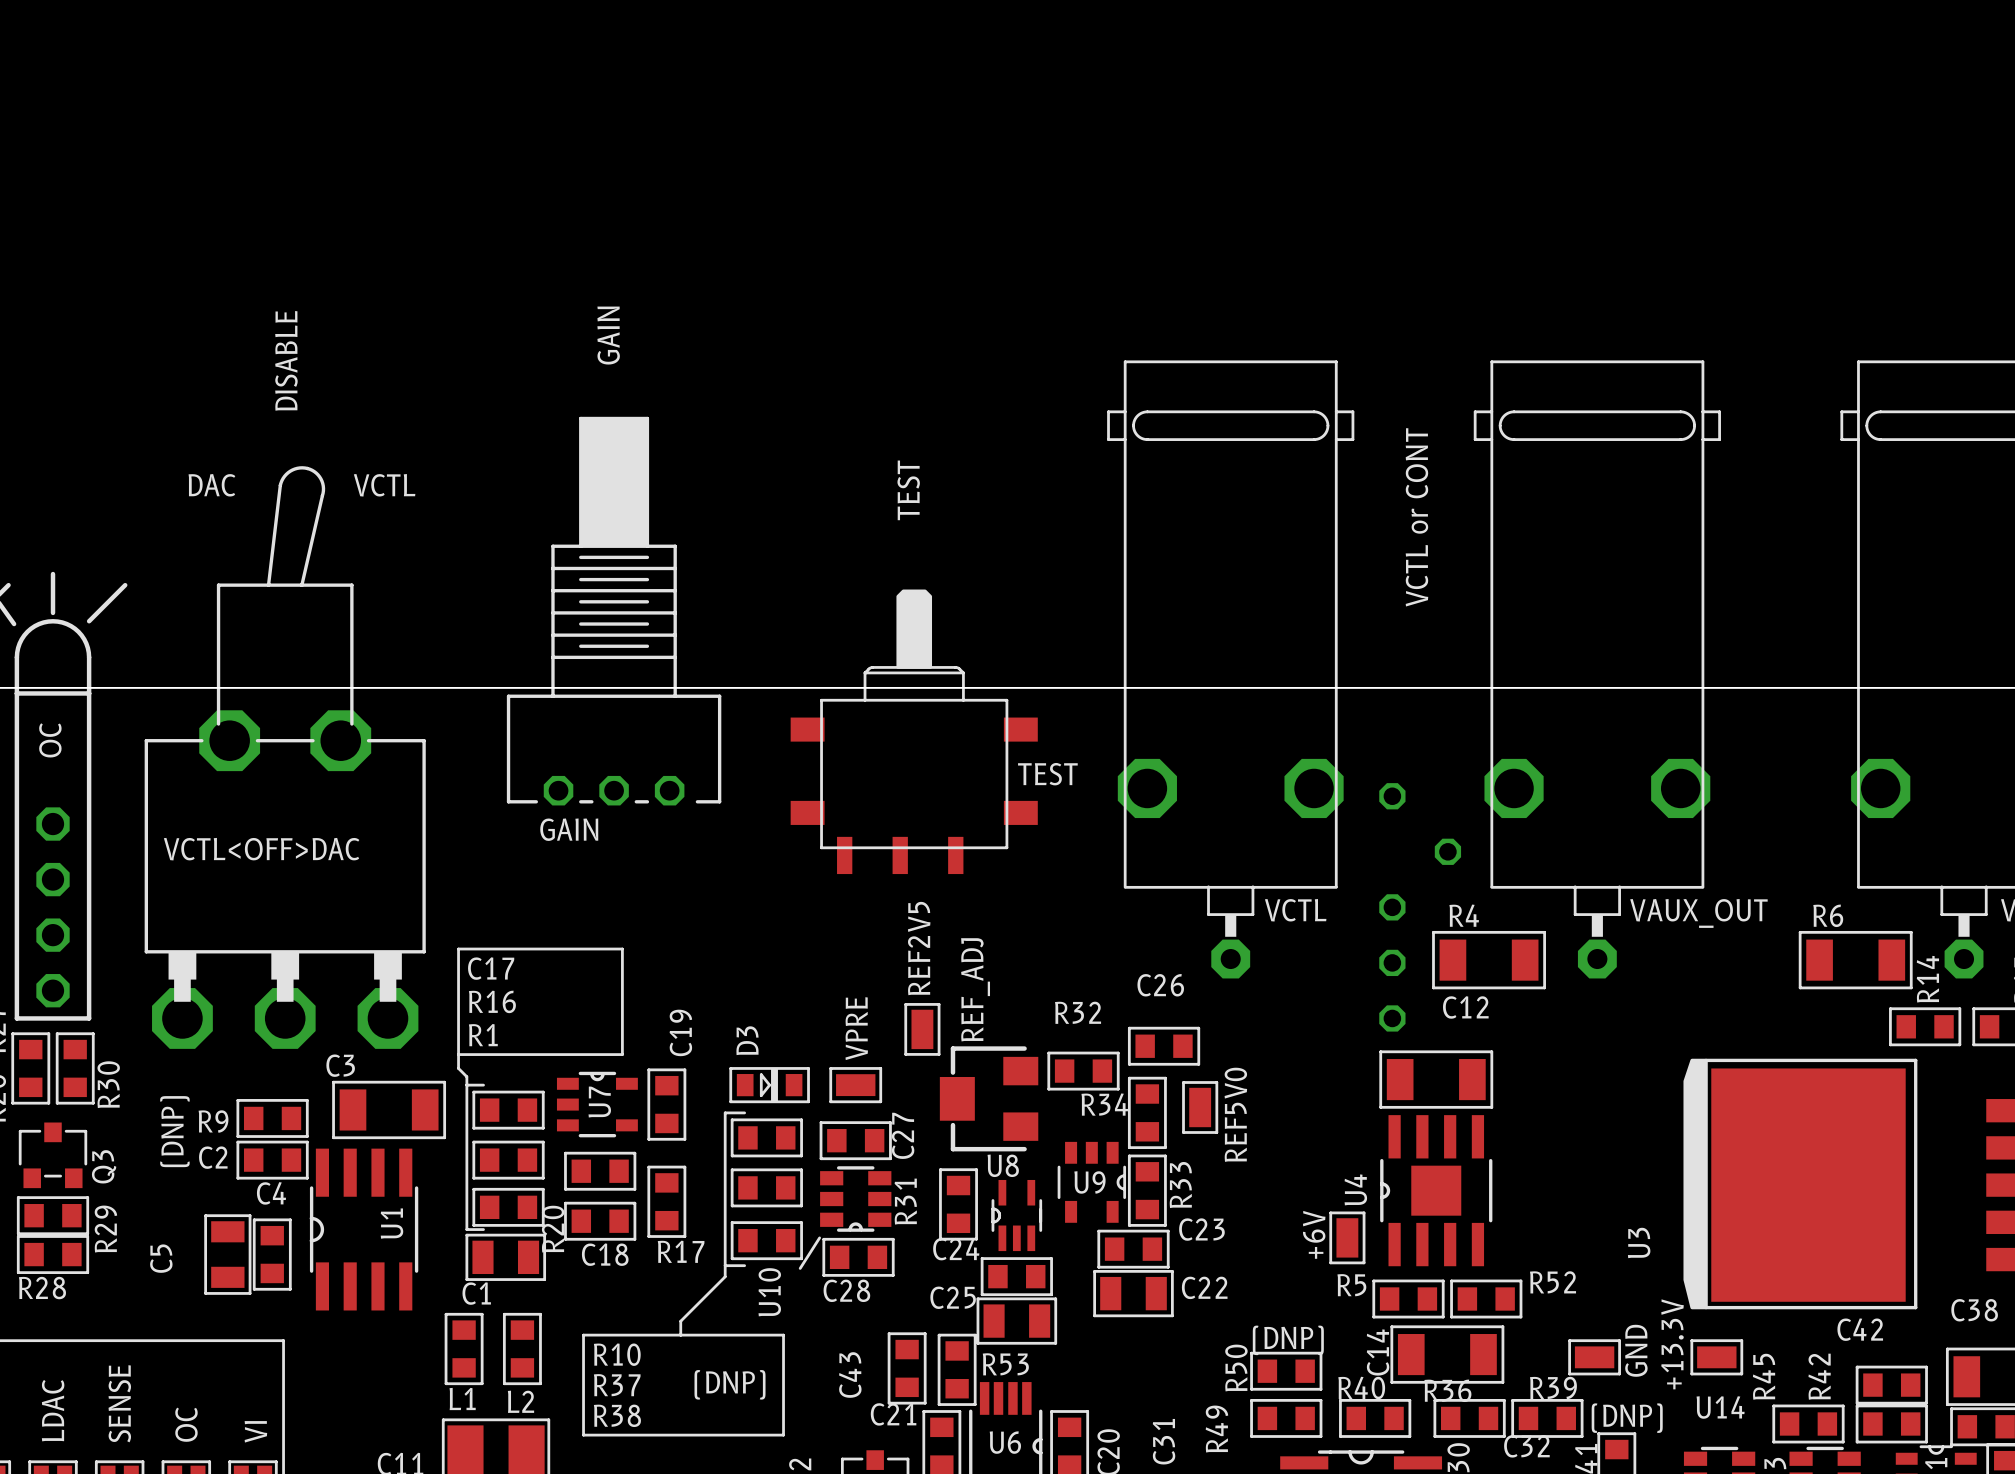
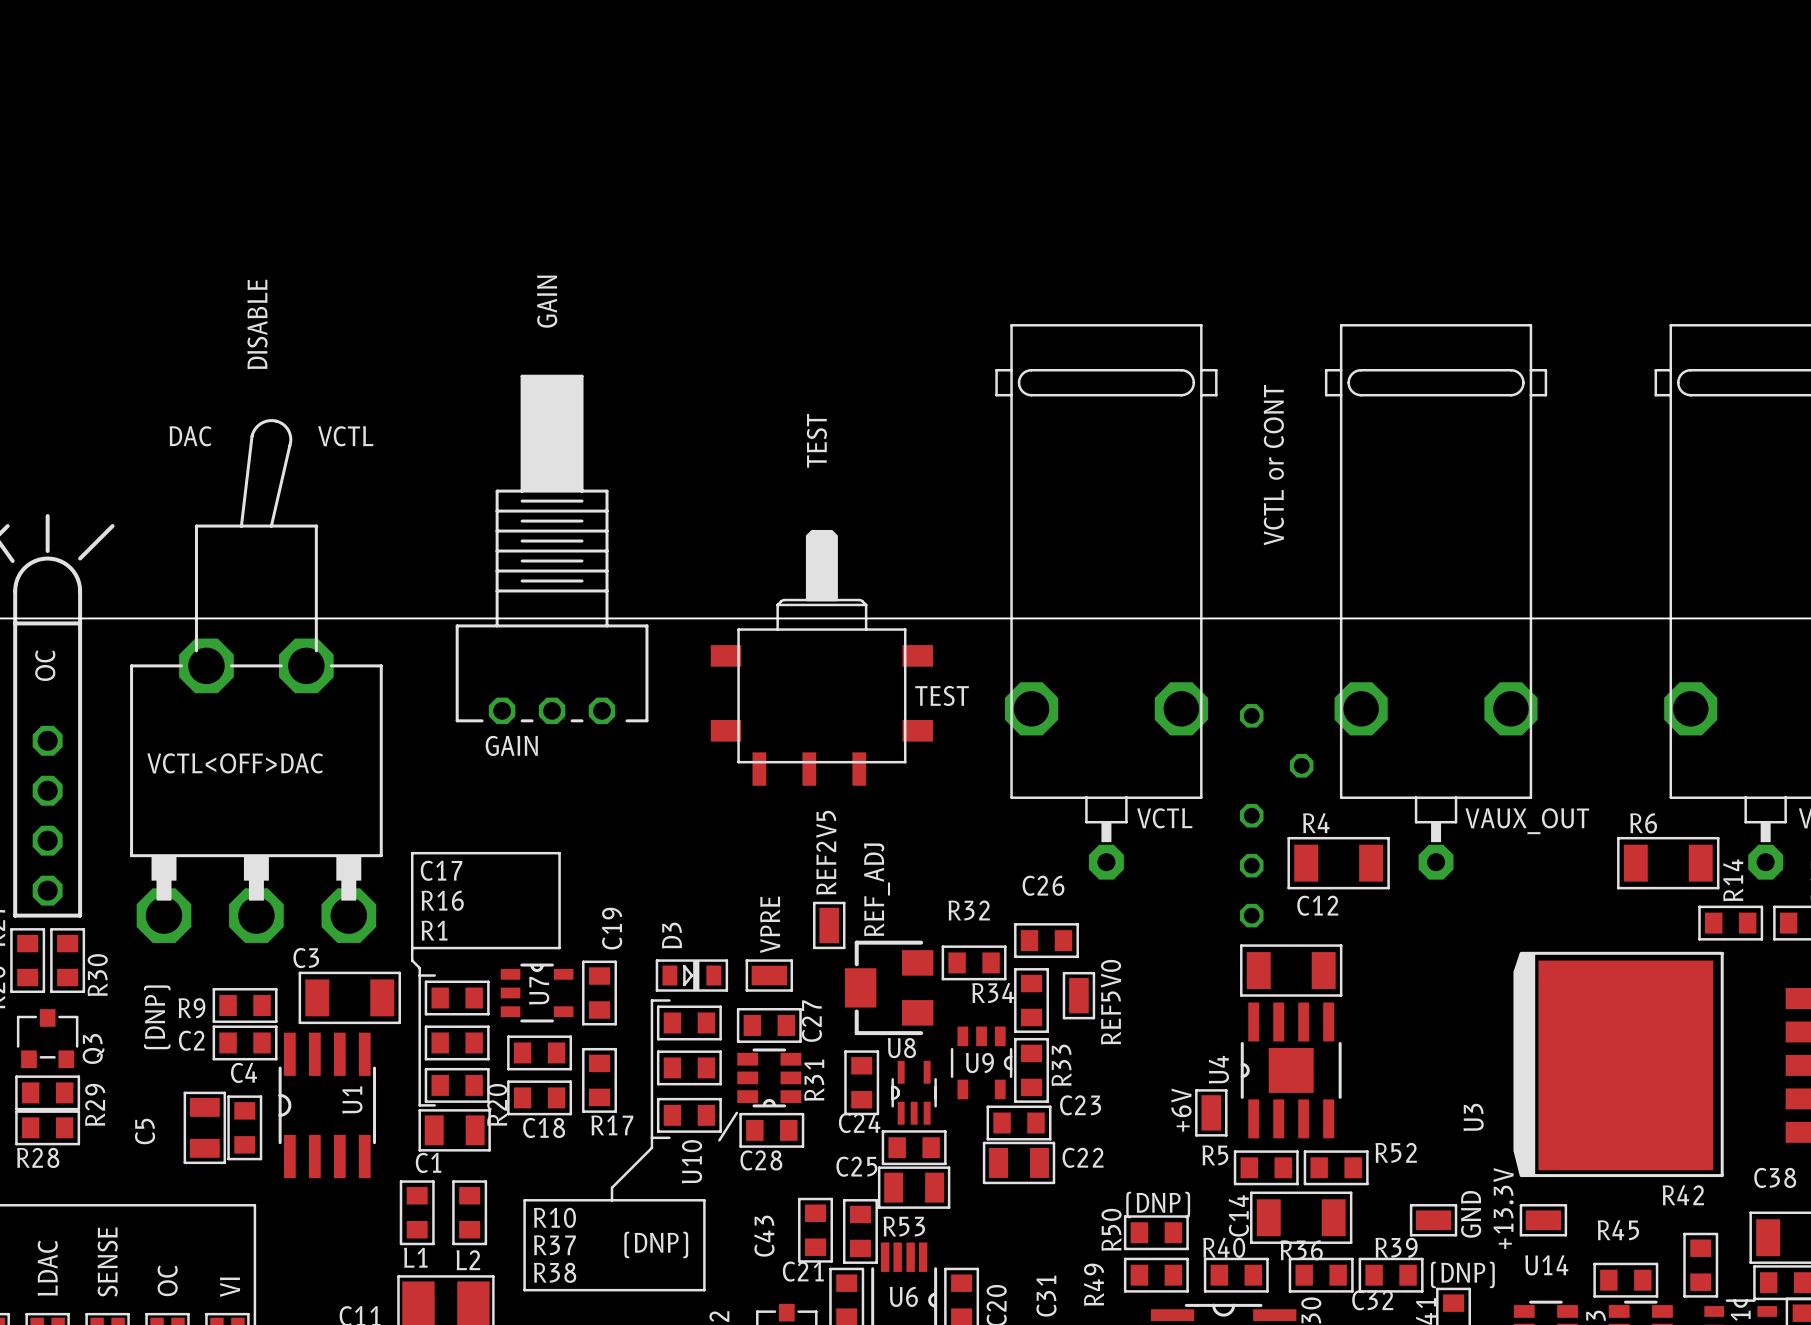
R45 name rotation: 0° (1764, 1376) -> 90° clockwise (1618, 1230)
R42 name position: R42 (1819, 1376) -> R42 (1683, 1195)
C42: (1891, 1385) -> none
R42 rotation: 0° (1891, 1424) -> 90° clockwise (1700, 1265)

